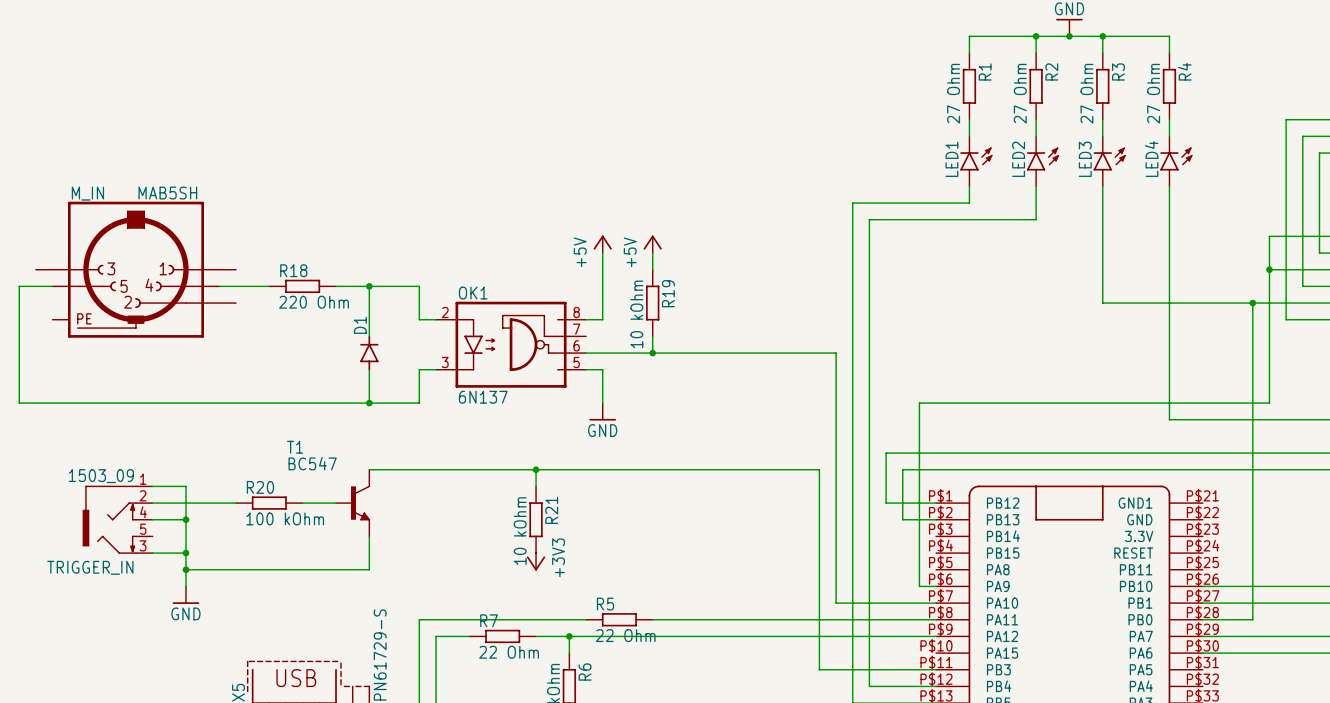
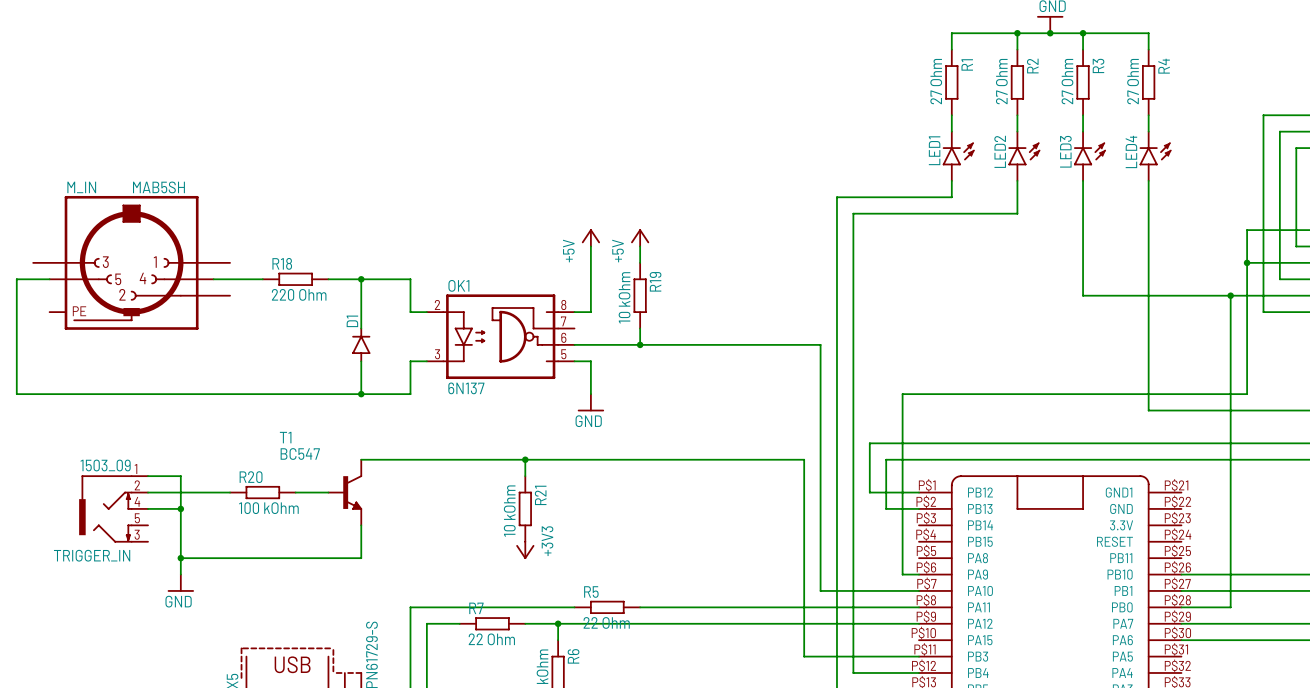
wire: (152, 553) (185, 553) -> none
junction: (185, 553) -> none

